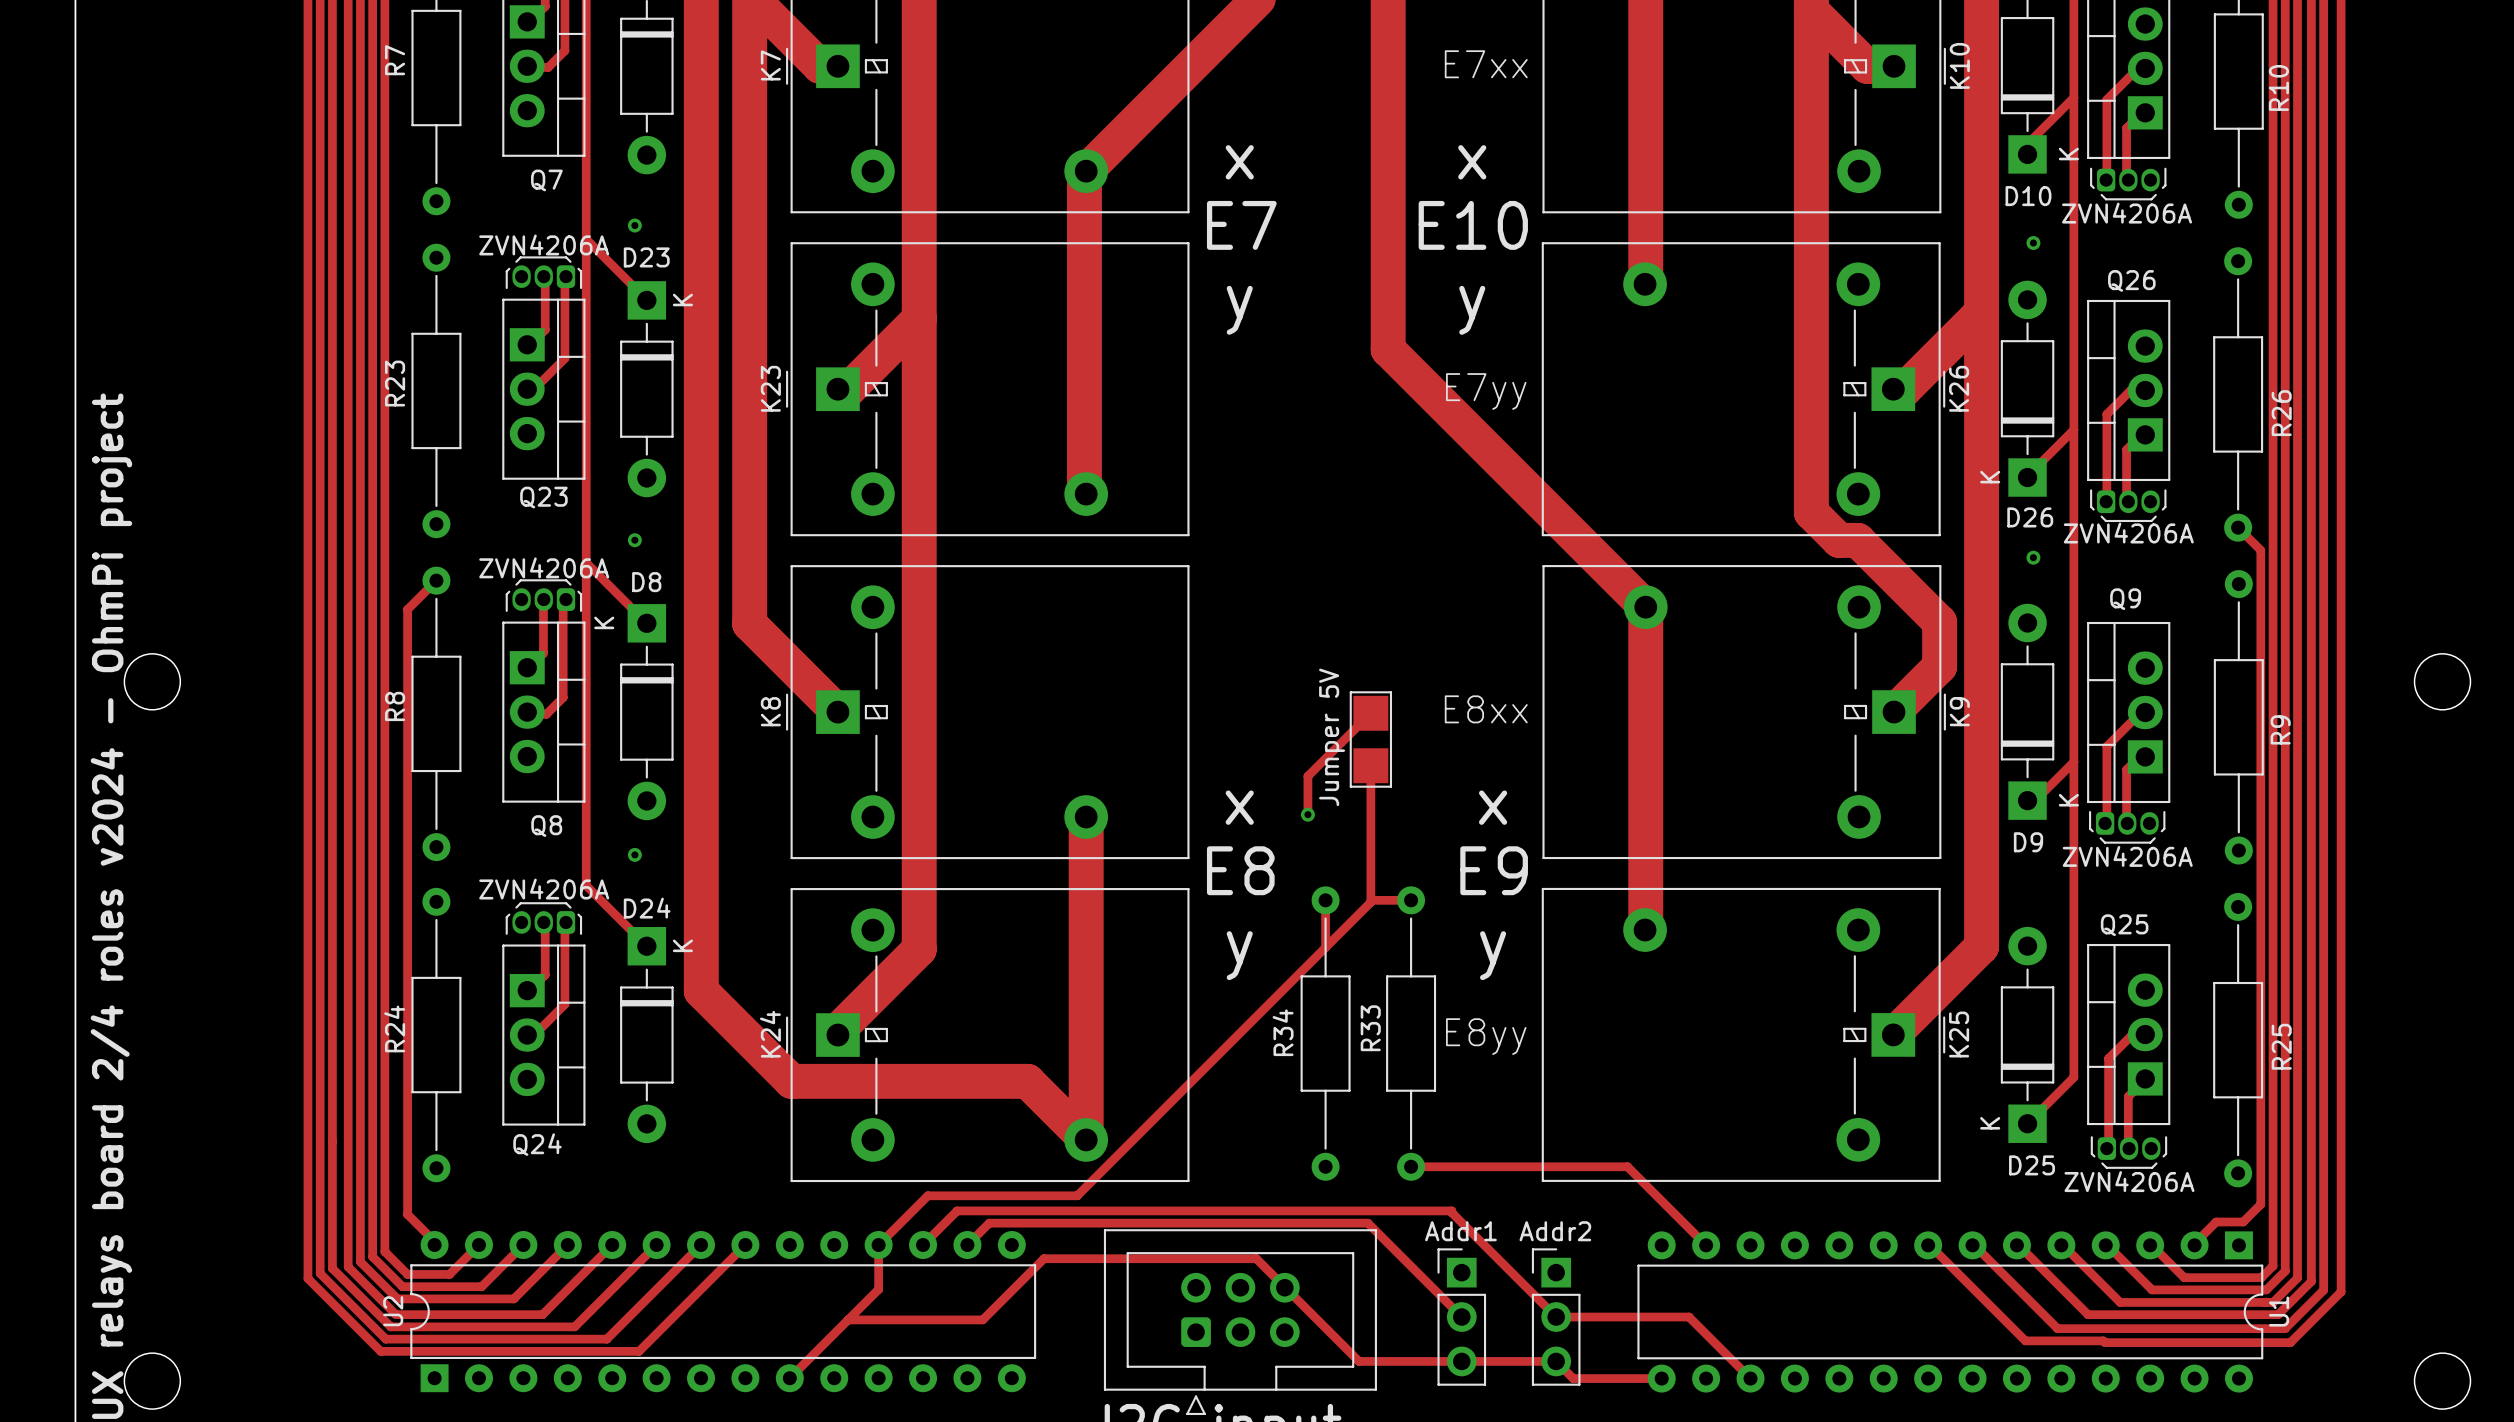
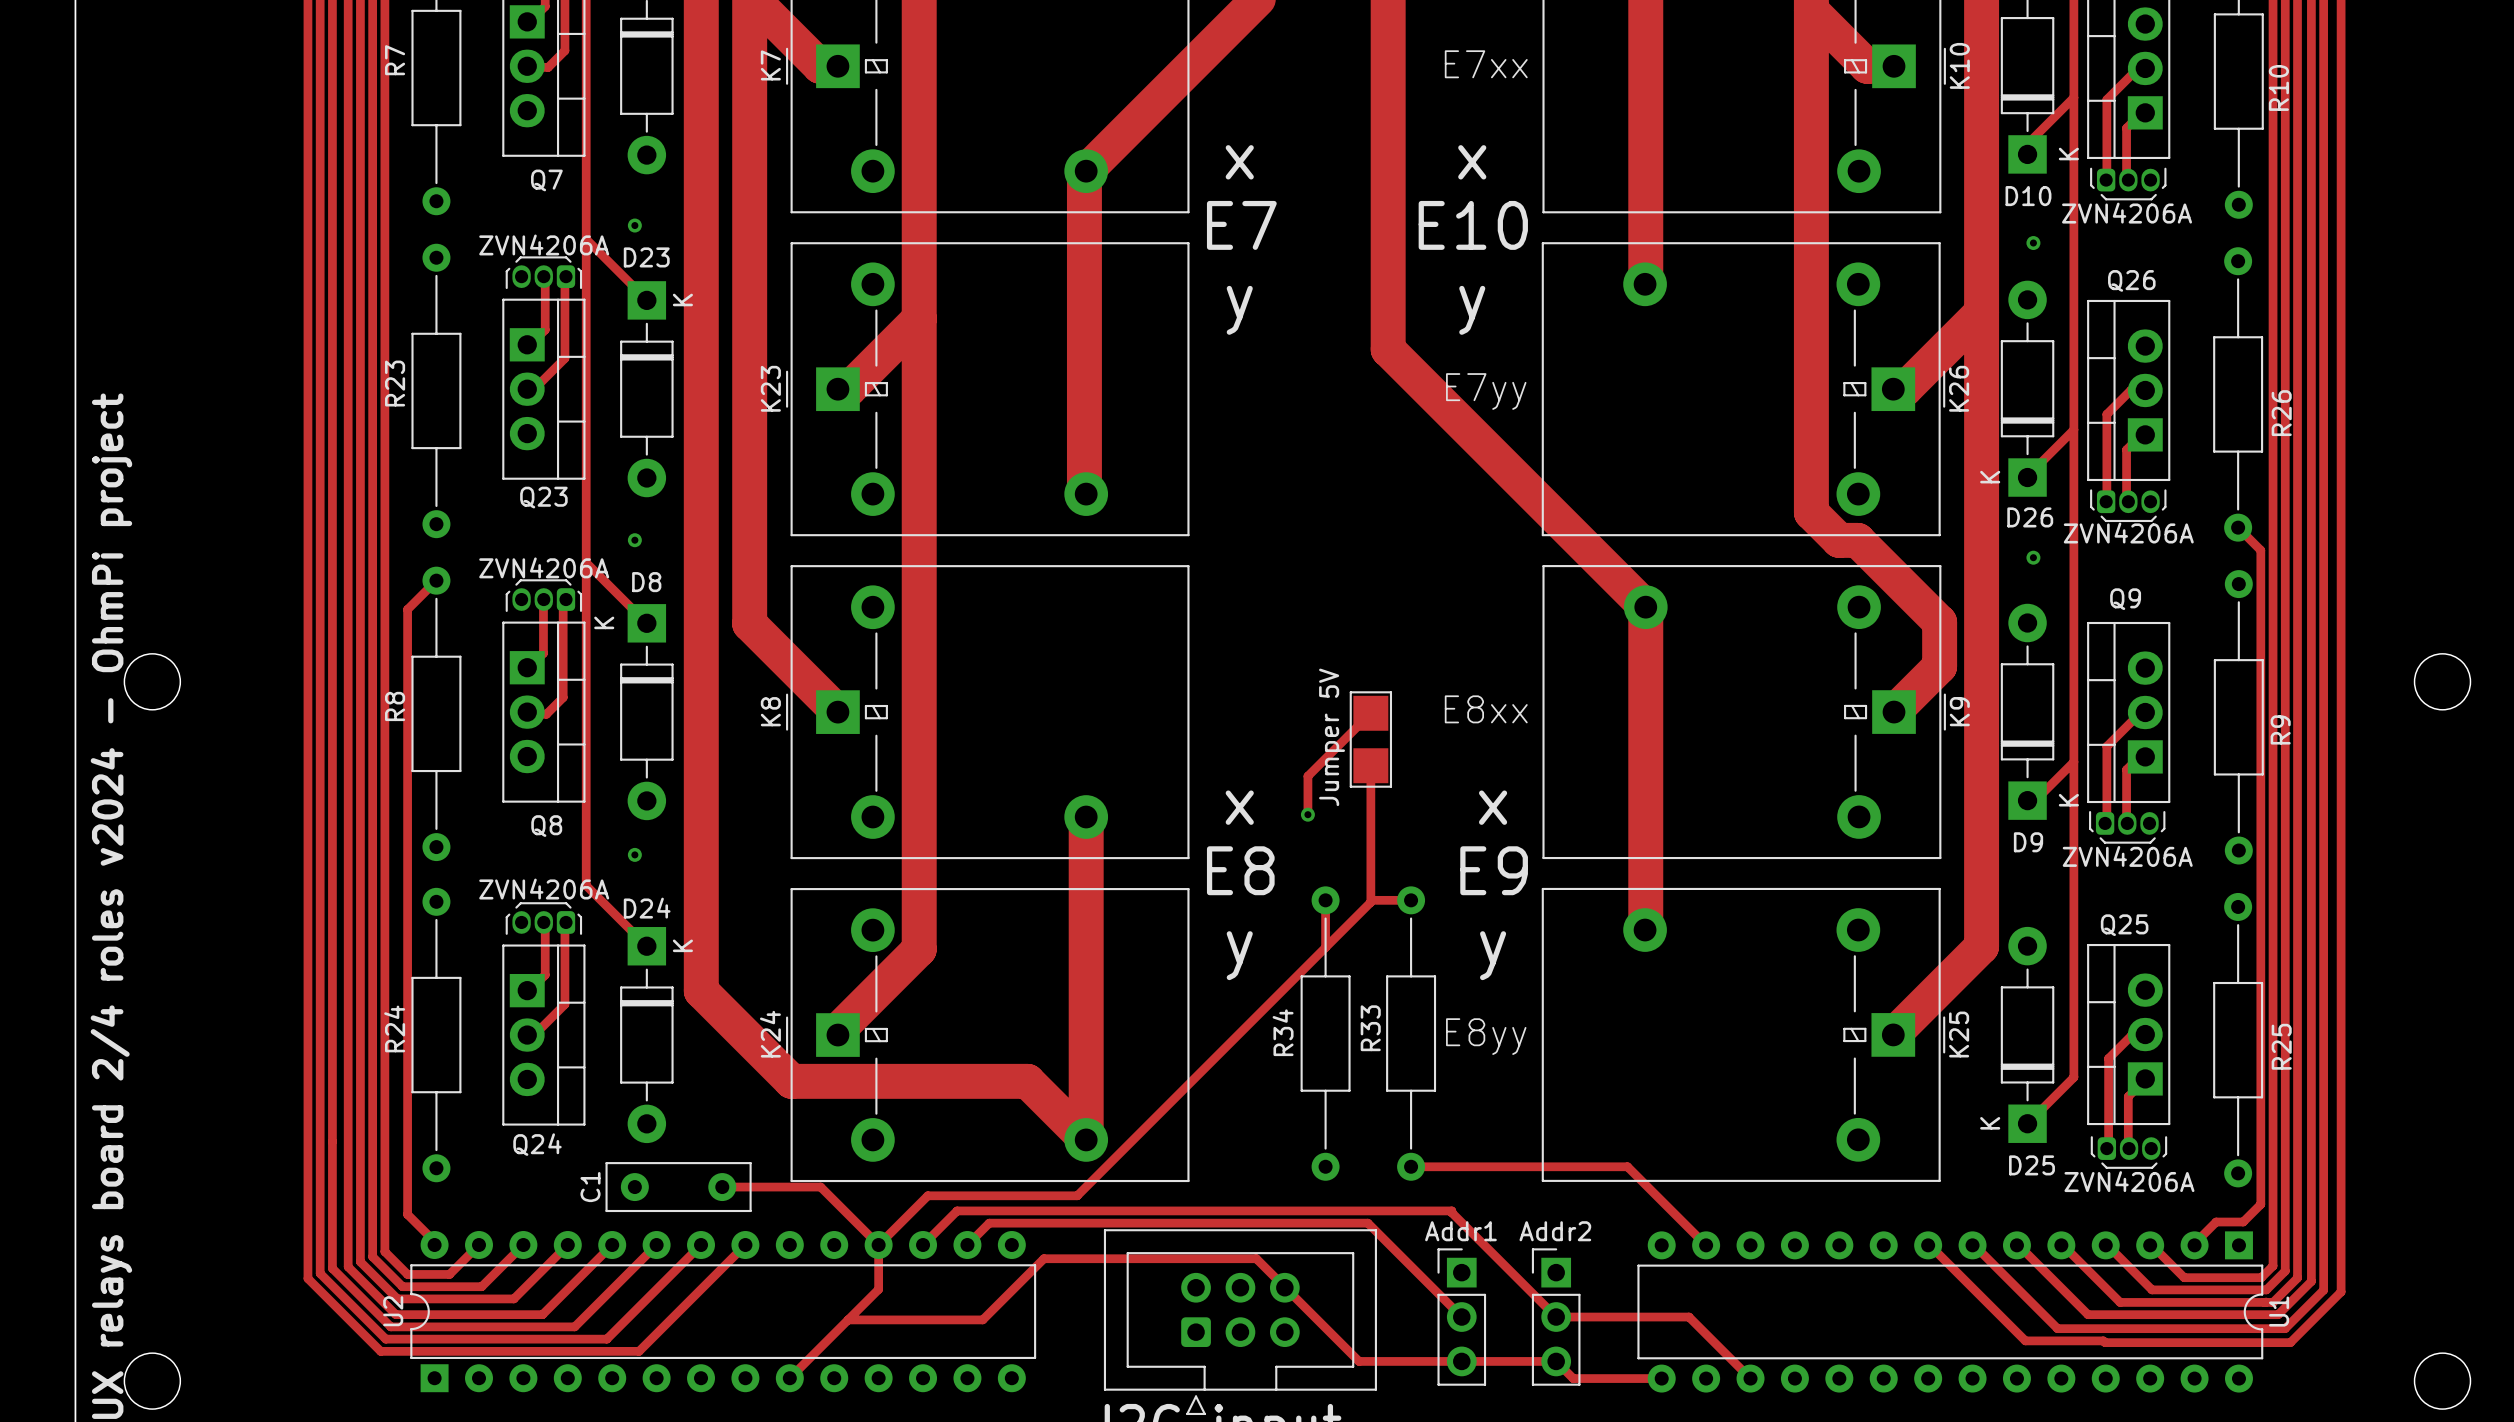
C1: none -> (678, 1187)
track: none -> (722, 1187) (820, 1187) (878, 1245)

